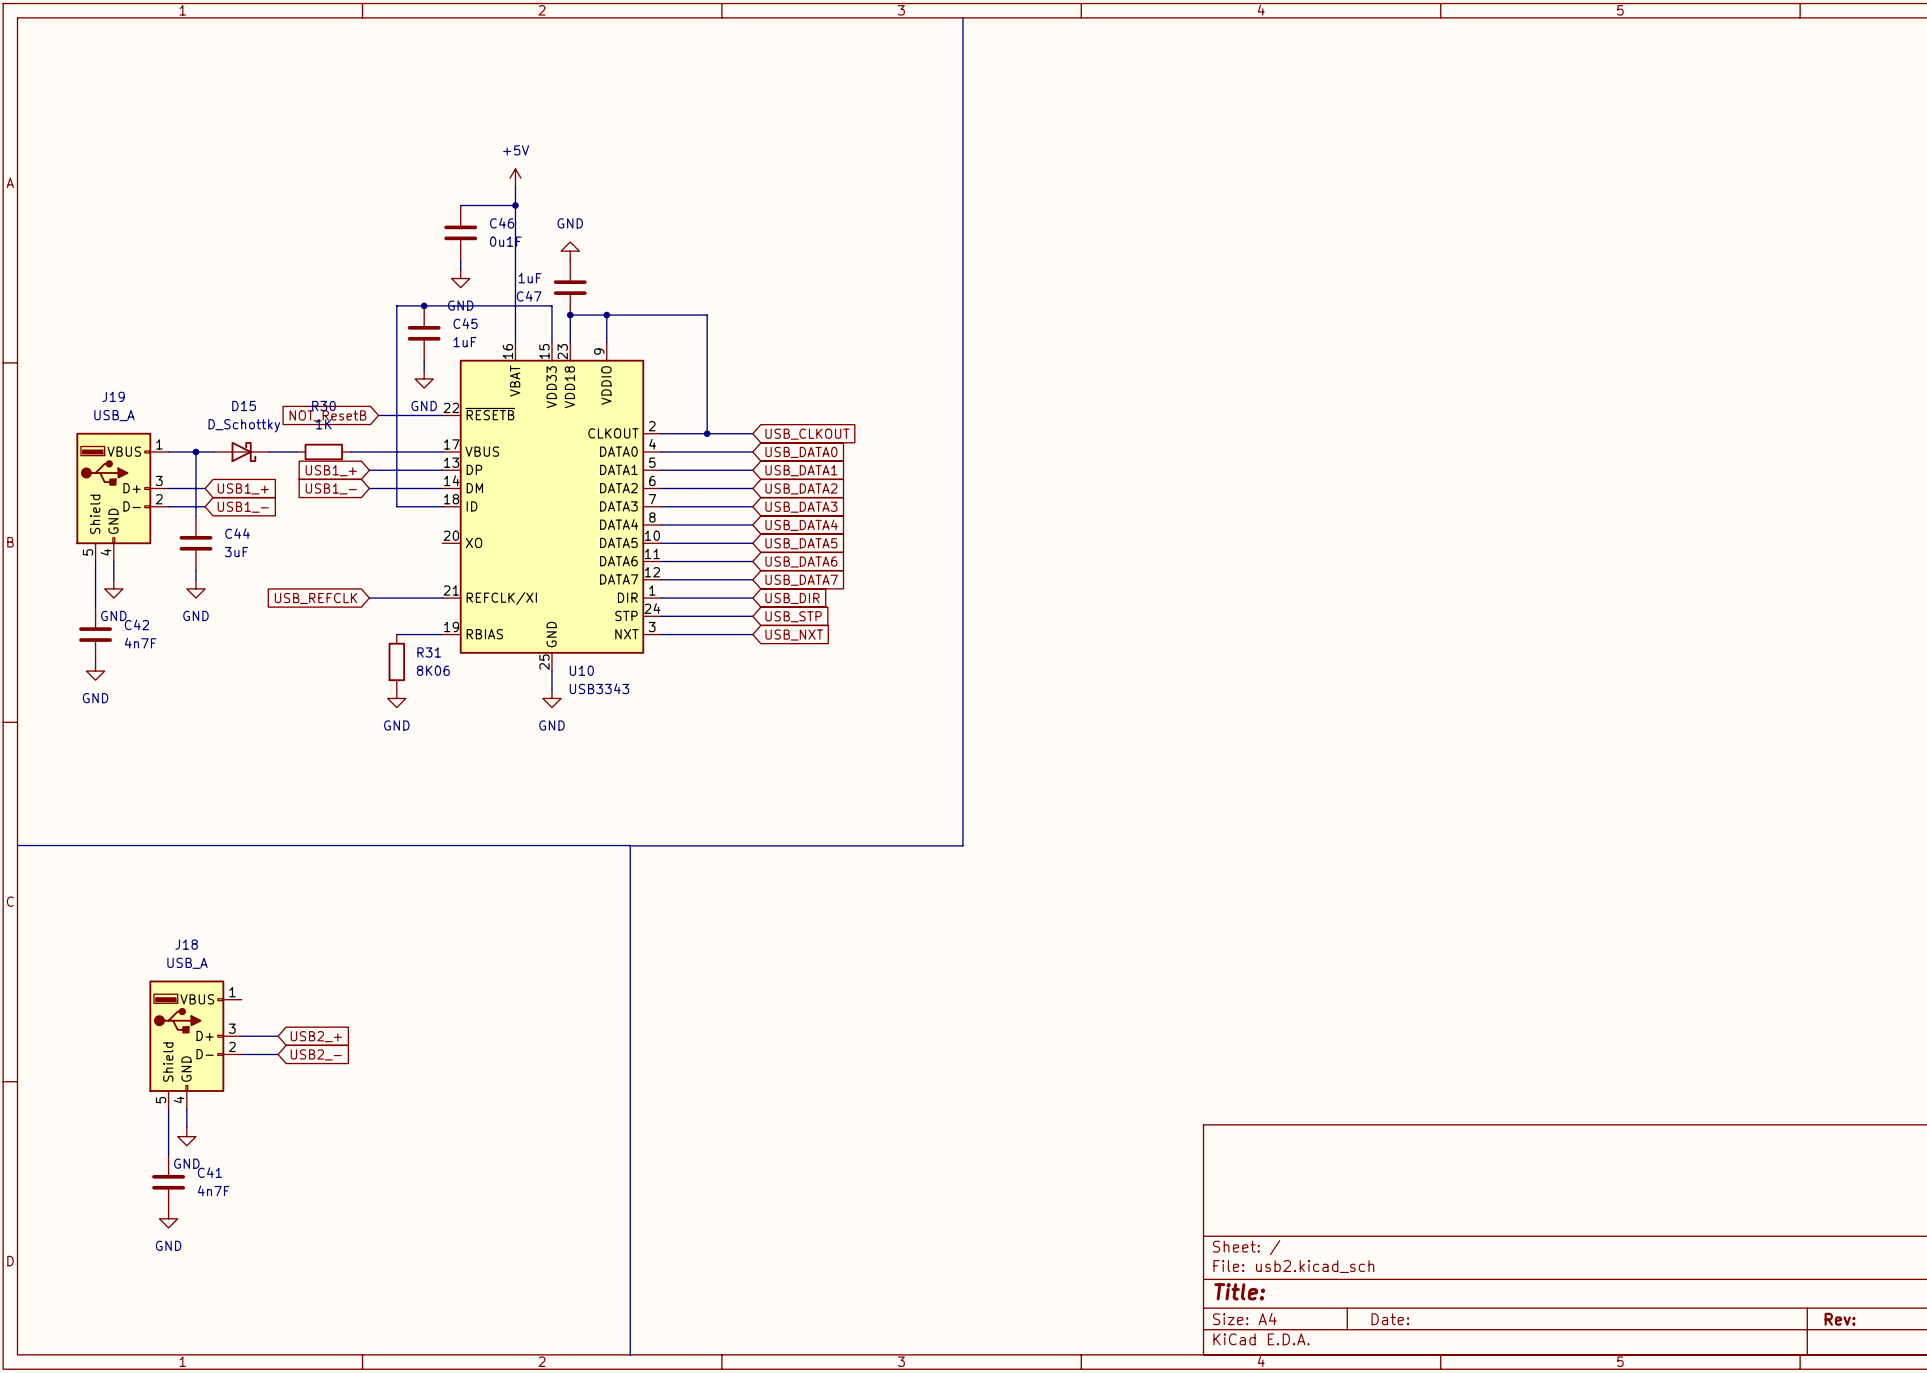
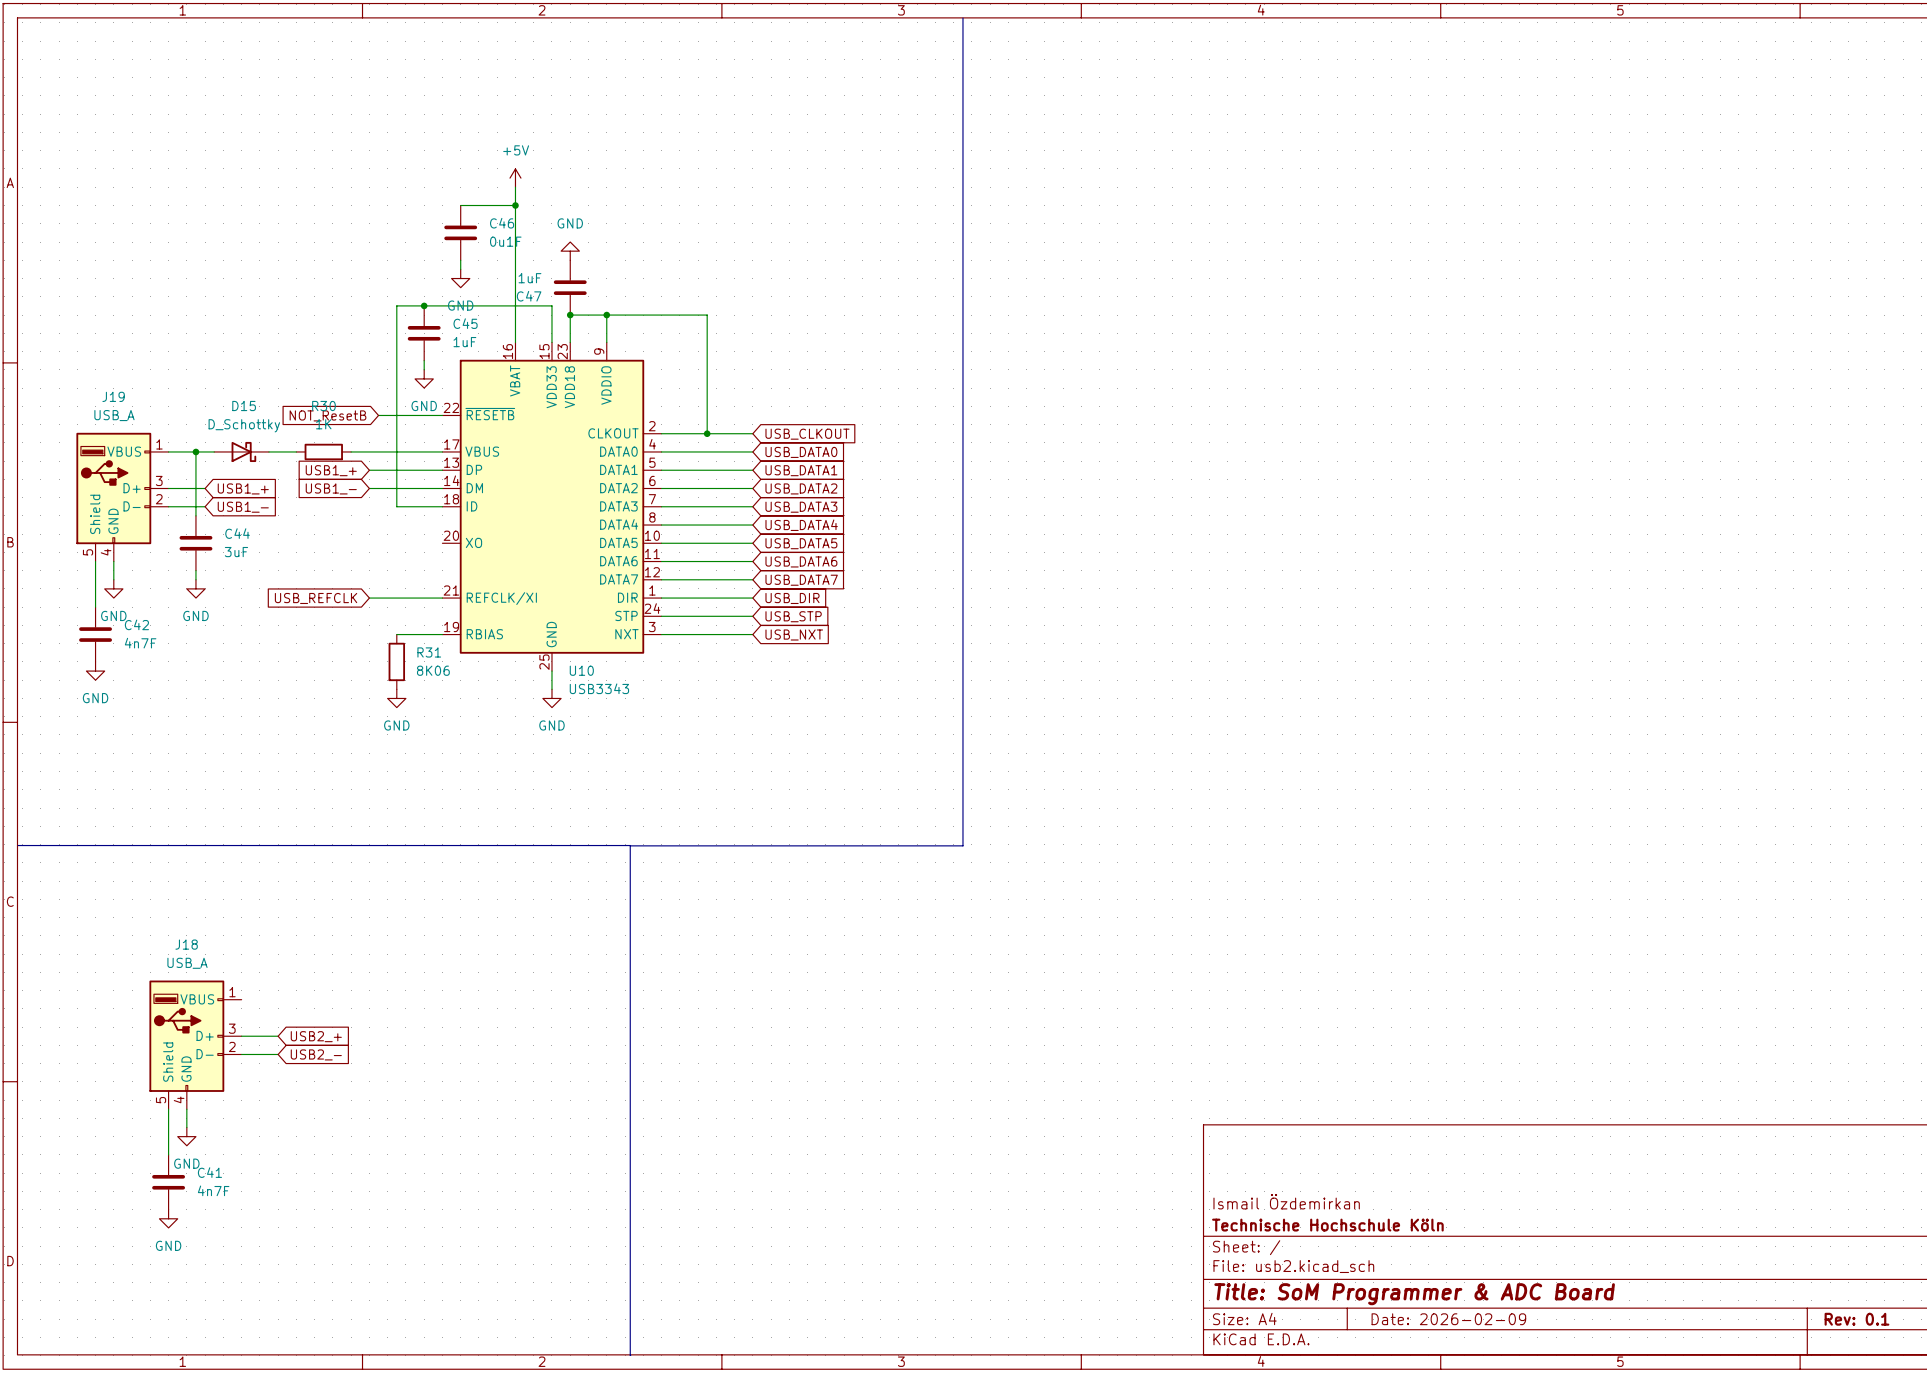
title block: none -> Ismail Özdemirkan (1286, 1201)
title block: none -> Technische Hochschule Köln (1327, 1225)
title block: Title: (1239, 1291) -> Title: SoM Programmer & ADC Board (1414, 1294)
title block: Date: (1390, 1319) -> Date: 2026-02-09 (1448, 1319)
title block: Rev: (1840, 1319) -> Rev: 0.1 (1856, 1319)

